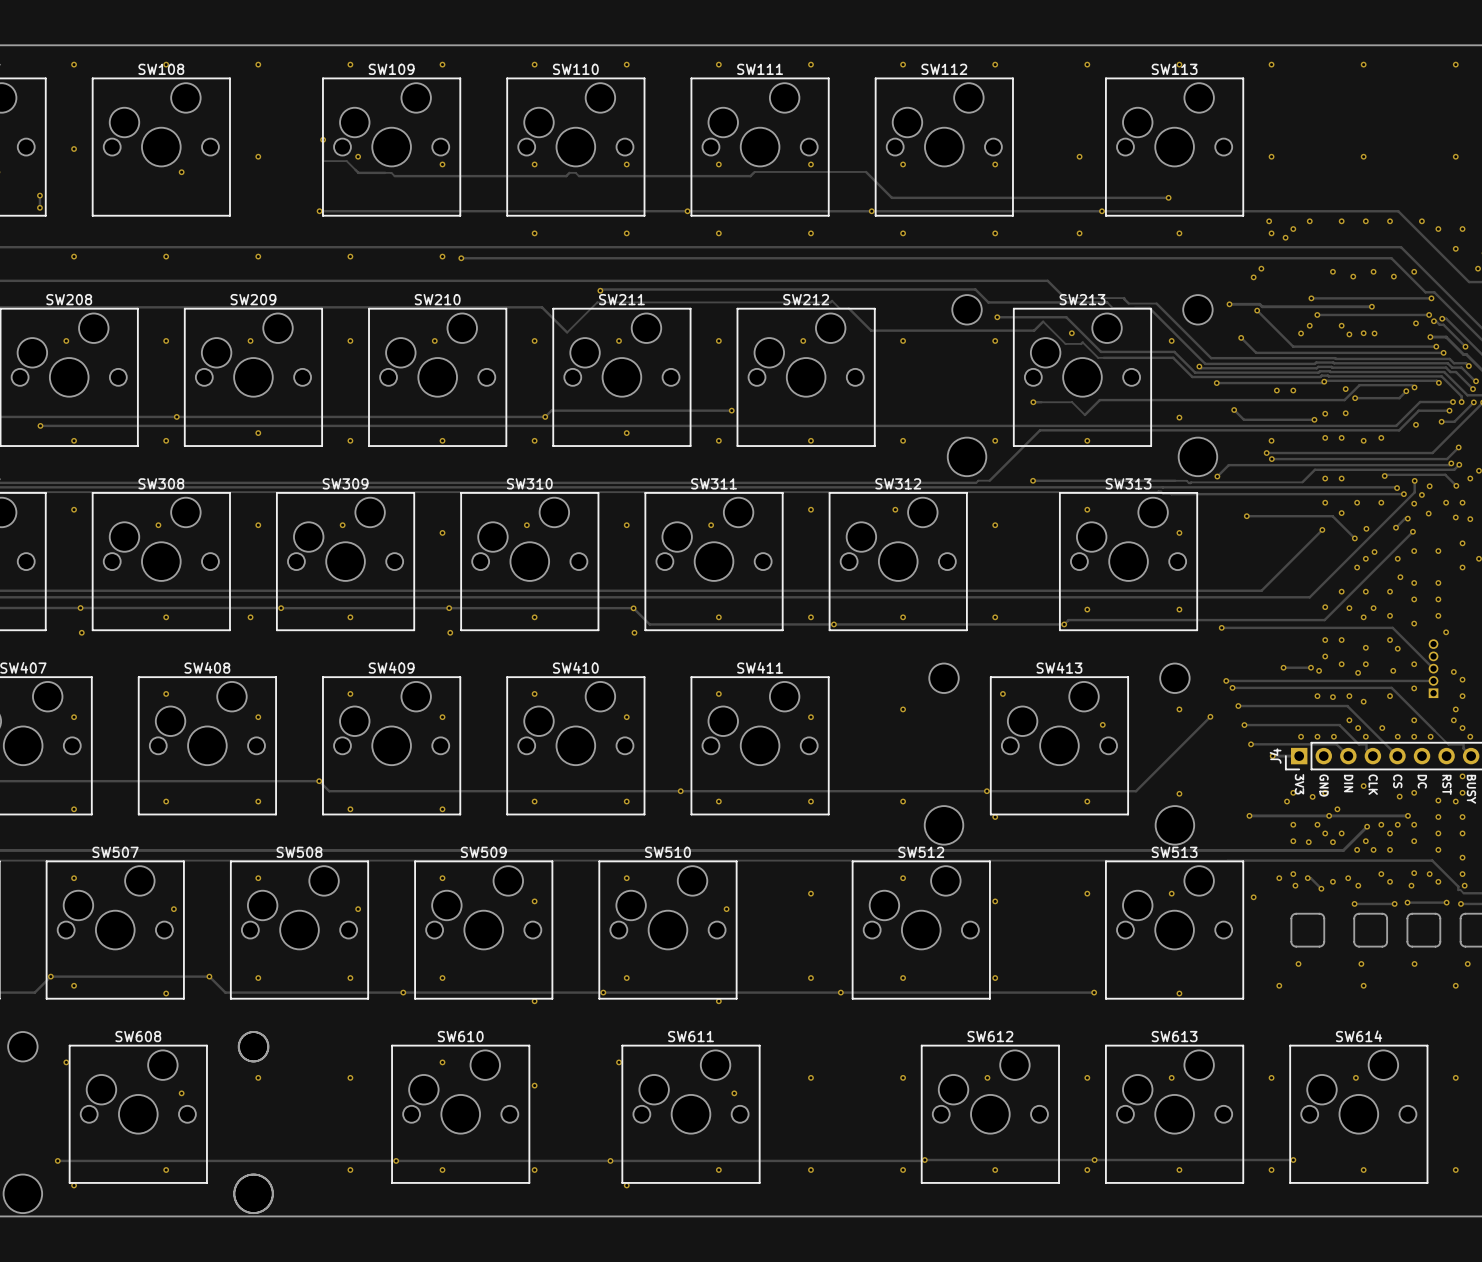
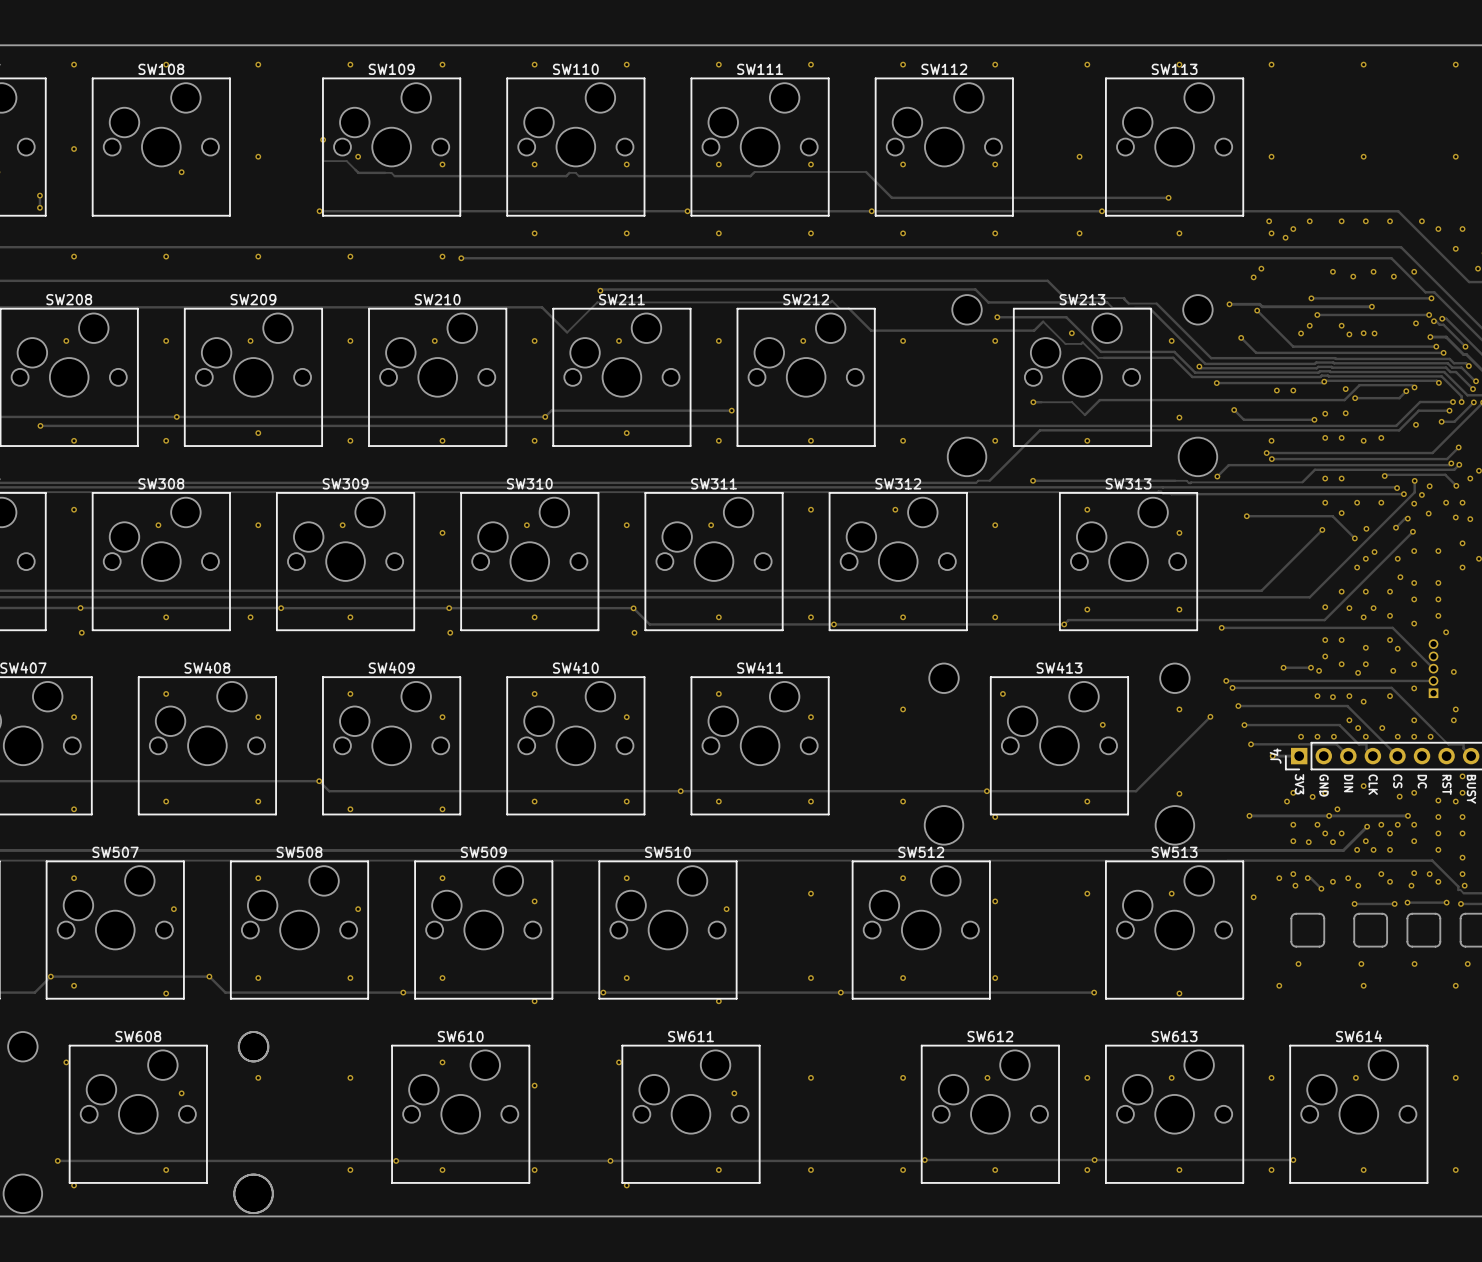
via: (1462, 679) -> none
via: (1462, 696) -> none
via: (1462, 728) -> none
via: (1470, 736) -> none

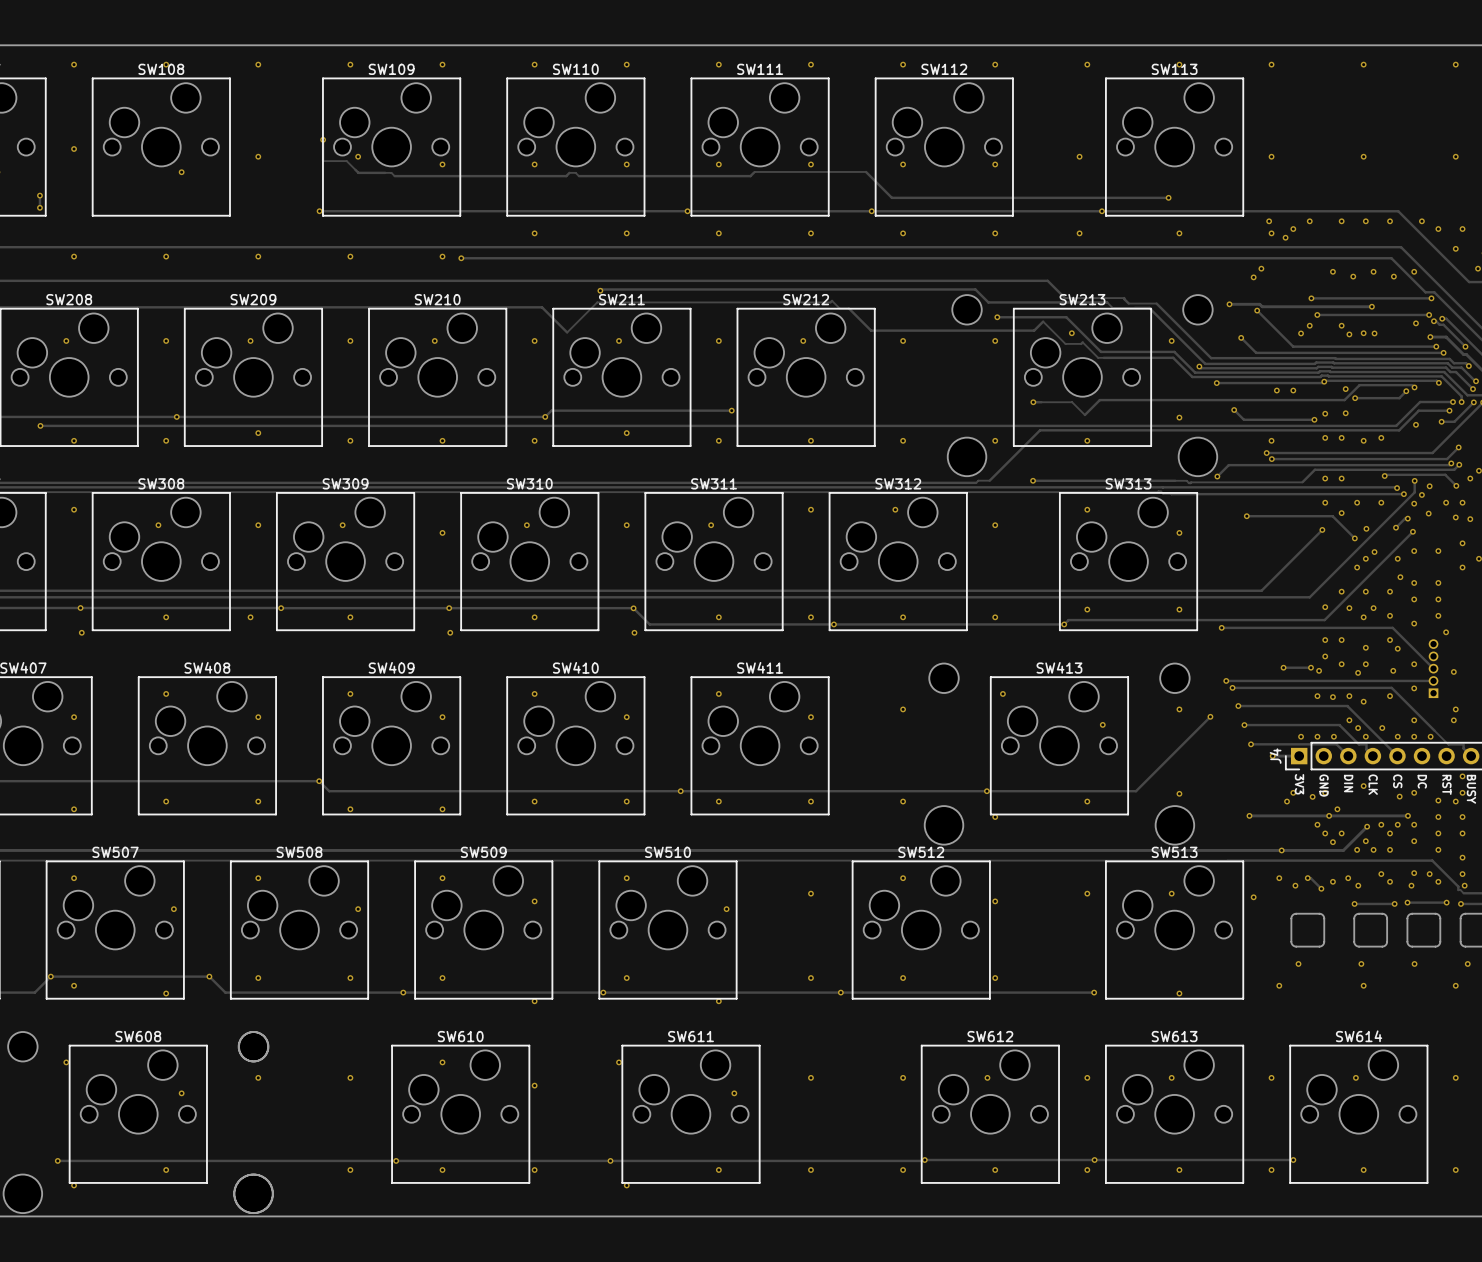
via: (1293, 824) -> none
via: (1293, 841) -> none
via: (1308, 842) -> none
via: none -> (1281, 850)
via: (1293, 874) -> none

